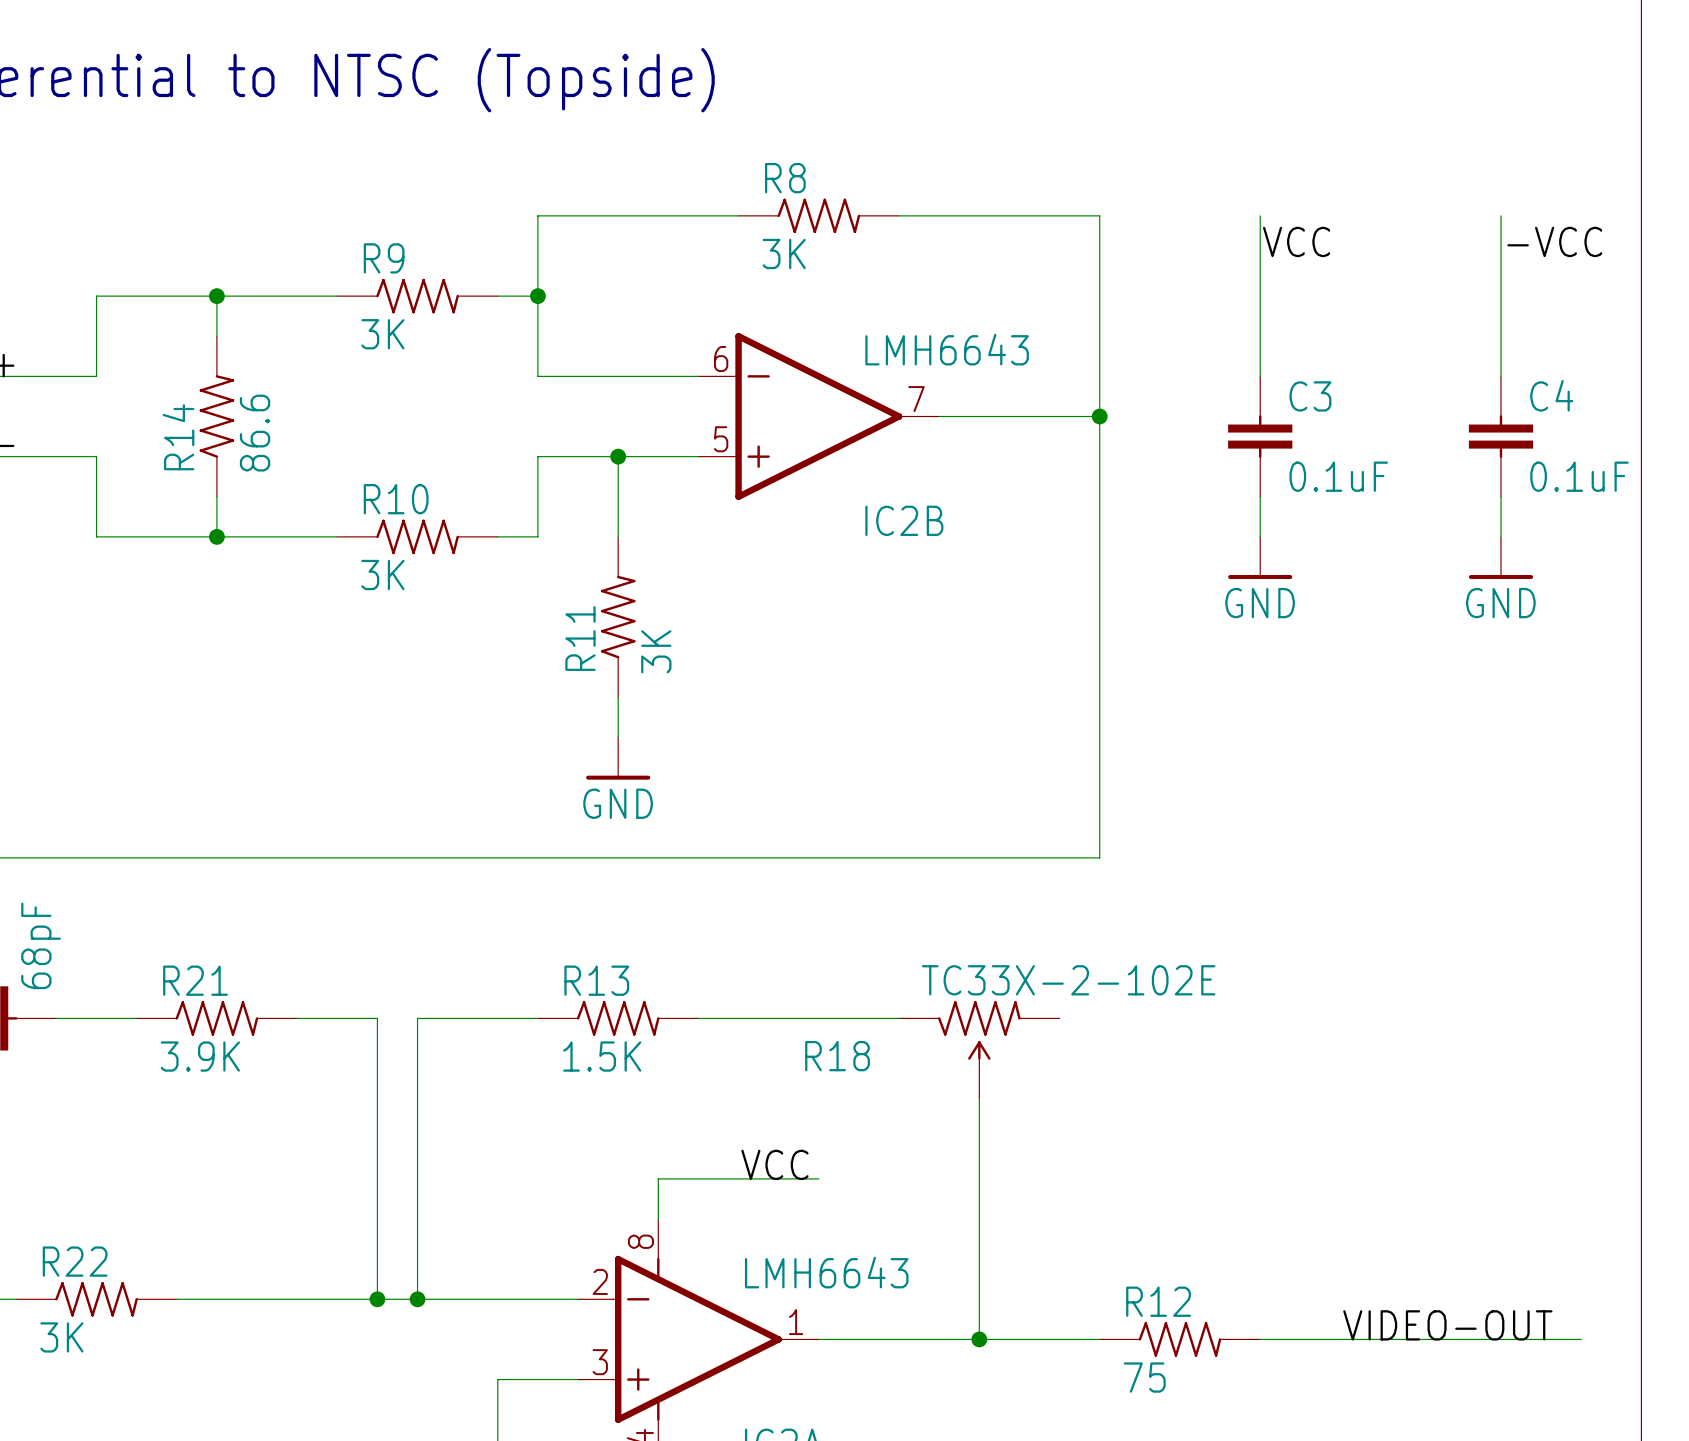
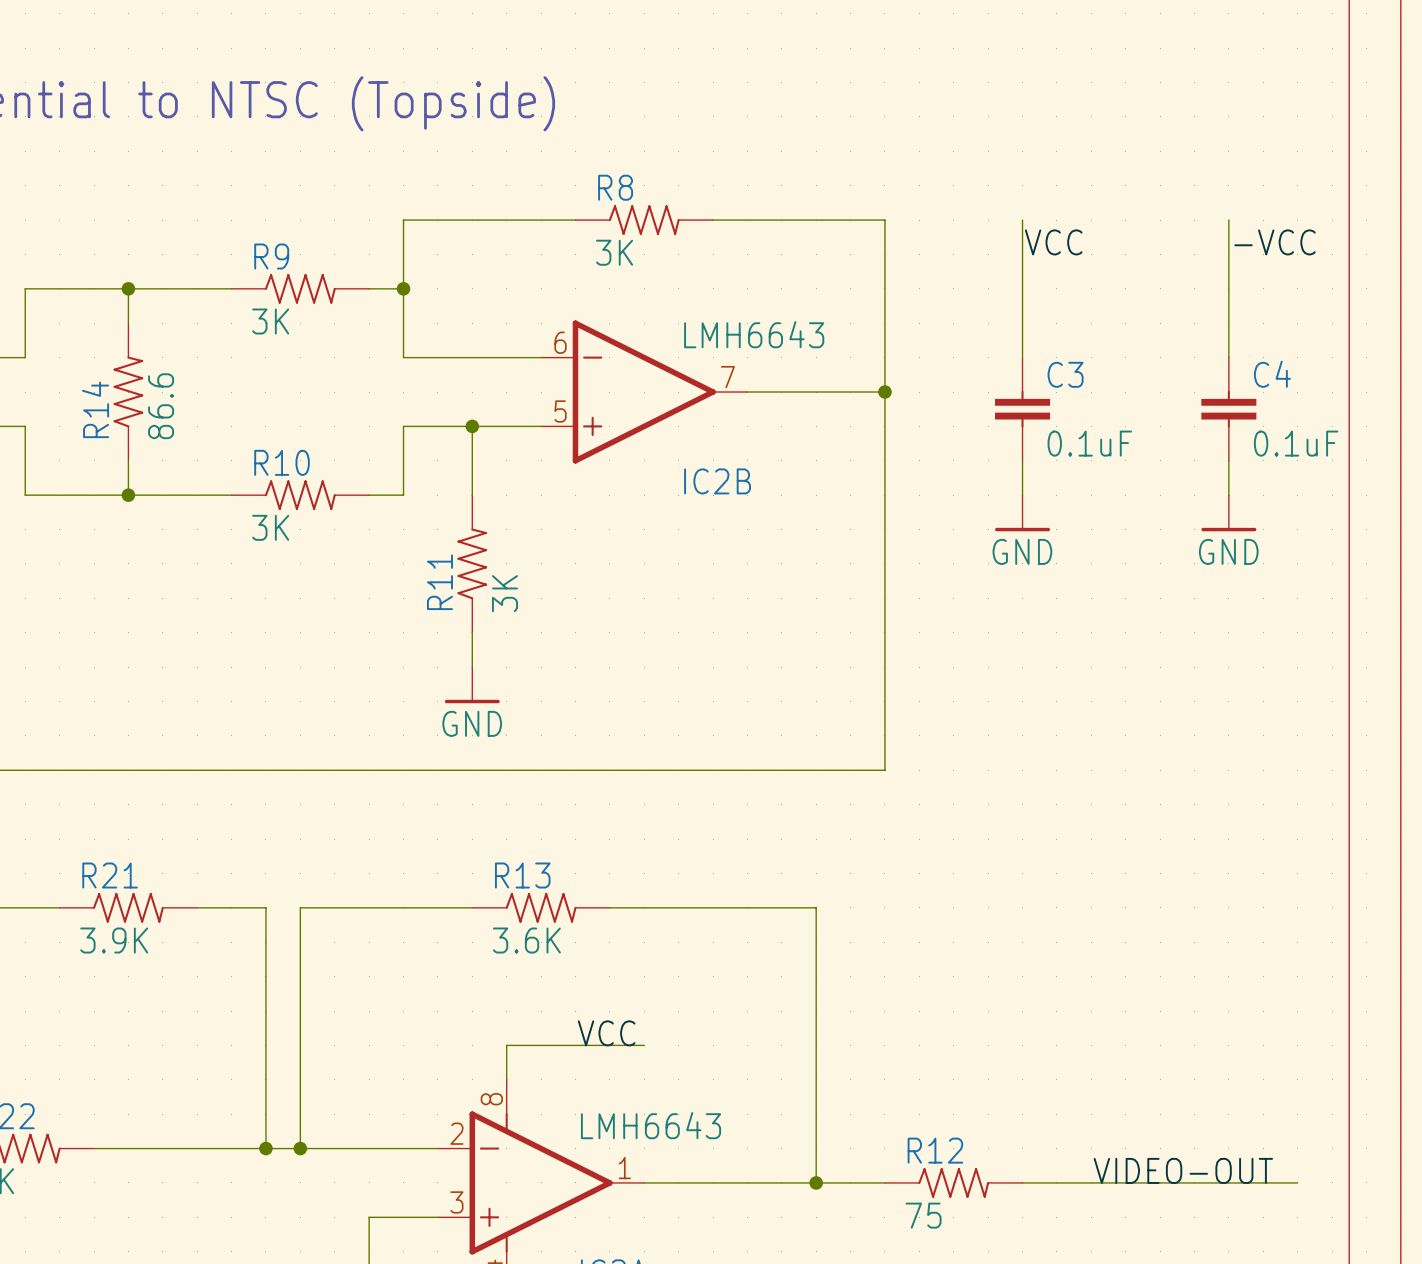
R13 position: (618, 1018) -> (541, 907)
wire: none -> (713, 907) (816, 907) (816, 1182)
R18: TC33X-2-102E (979, 1049) -> none
R13 value: 1.5K (602, 1056) -> 3.6K (526, 940)
wire: (979, 1098) (979, 1339) -> none
junction position: (979, 1339) -> (816, 1182)

